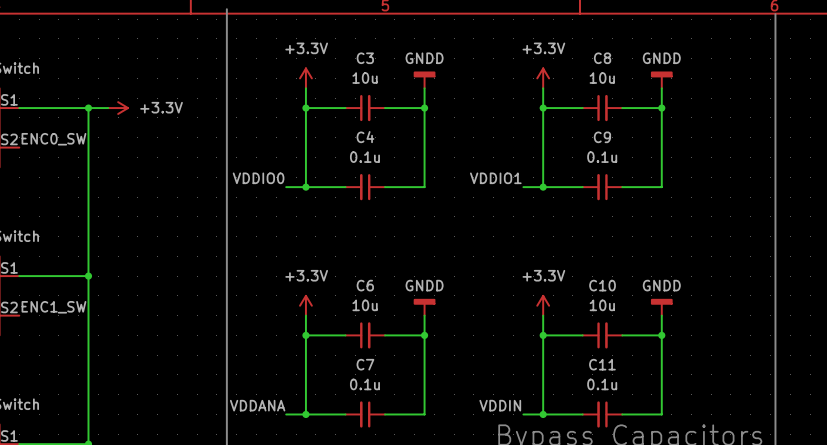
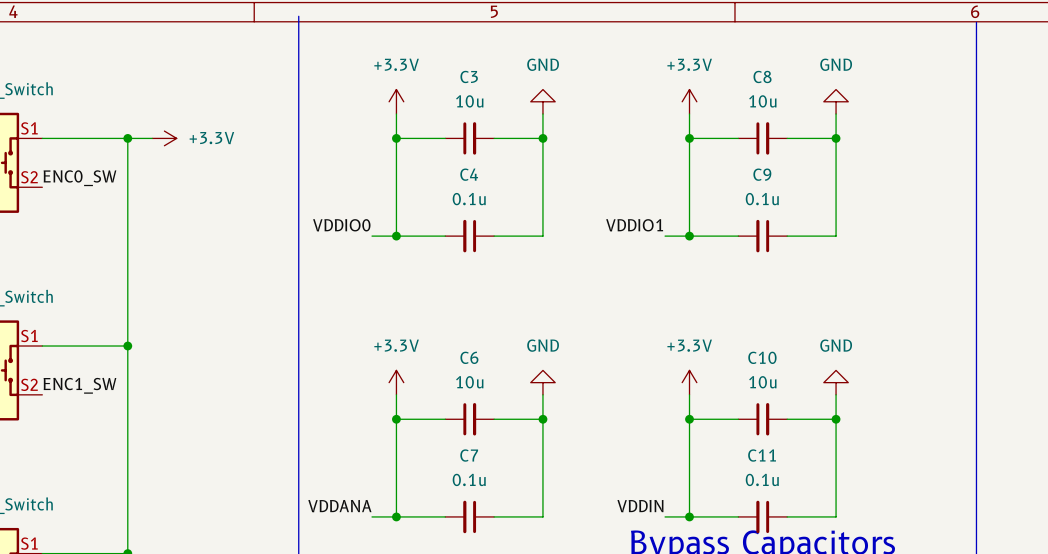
power symbol: GNDD (424, 79) -> GND (542, 101)
power symbol: GNDD (661, 79) -> GND (836, 101)
power symbol: GNDD (424, 307) -> GND (542, 382)
power symbol: GNDD (661, 307) -> GND (836, 382)

